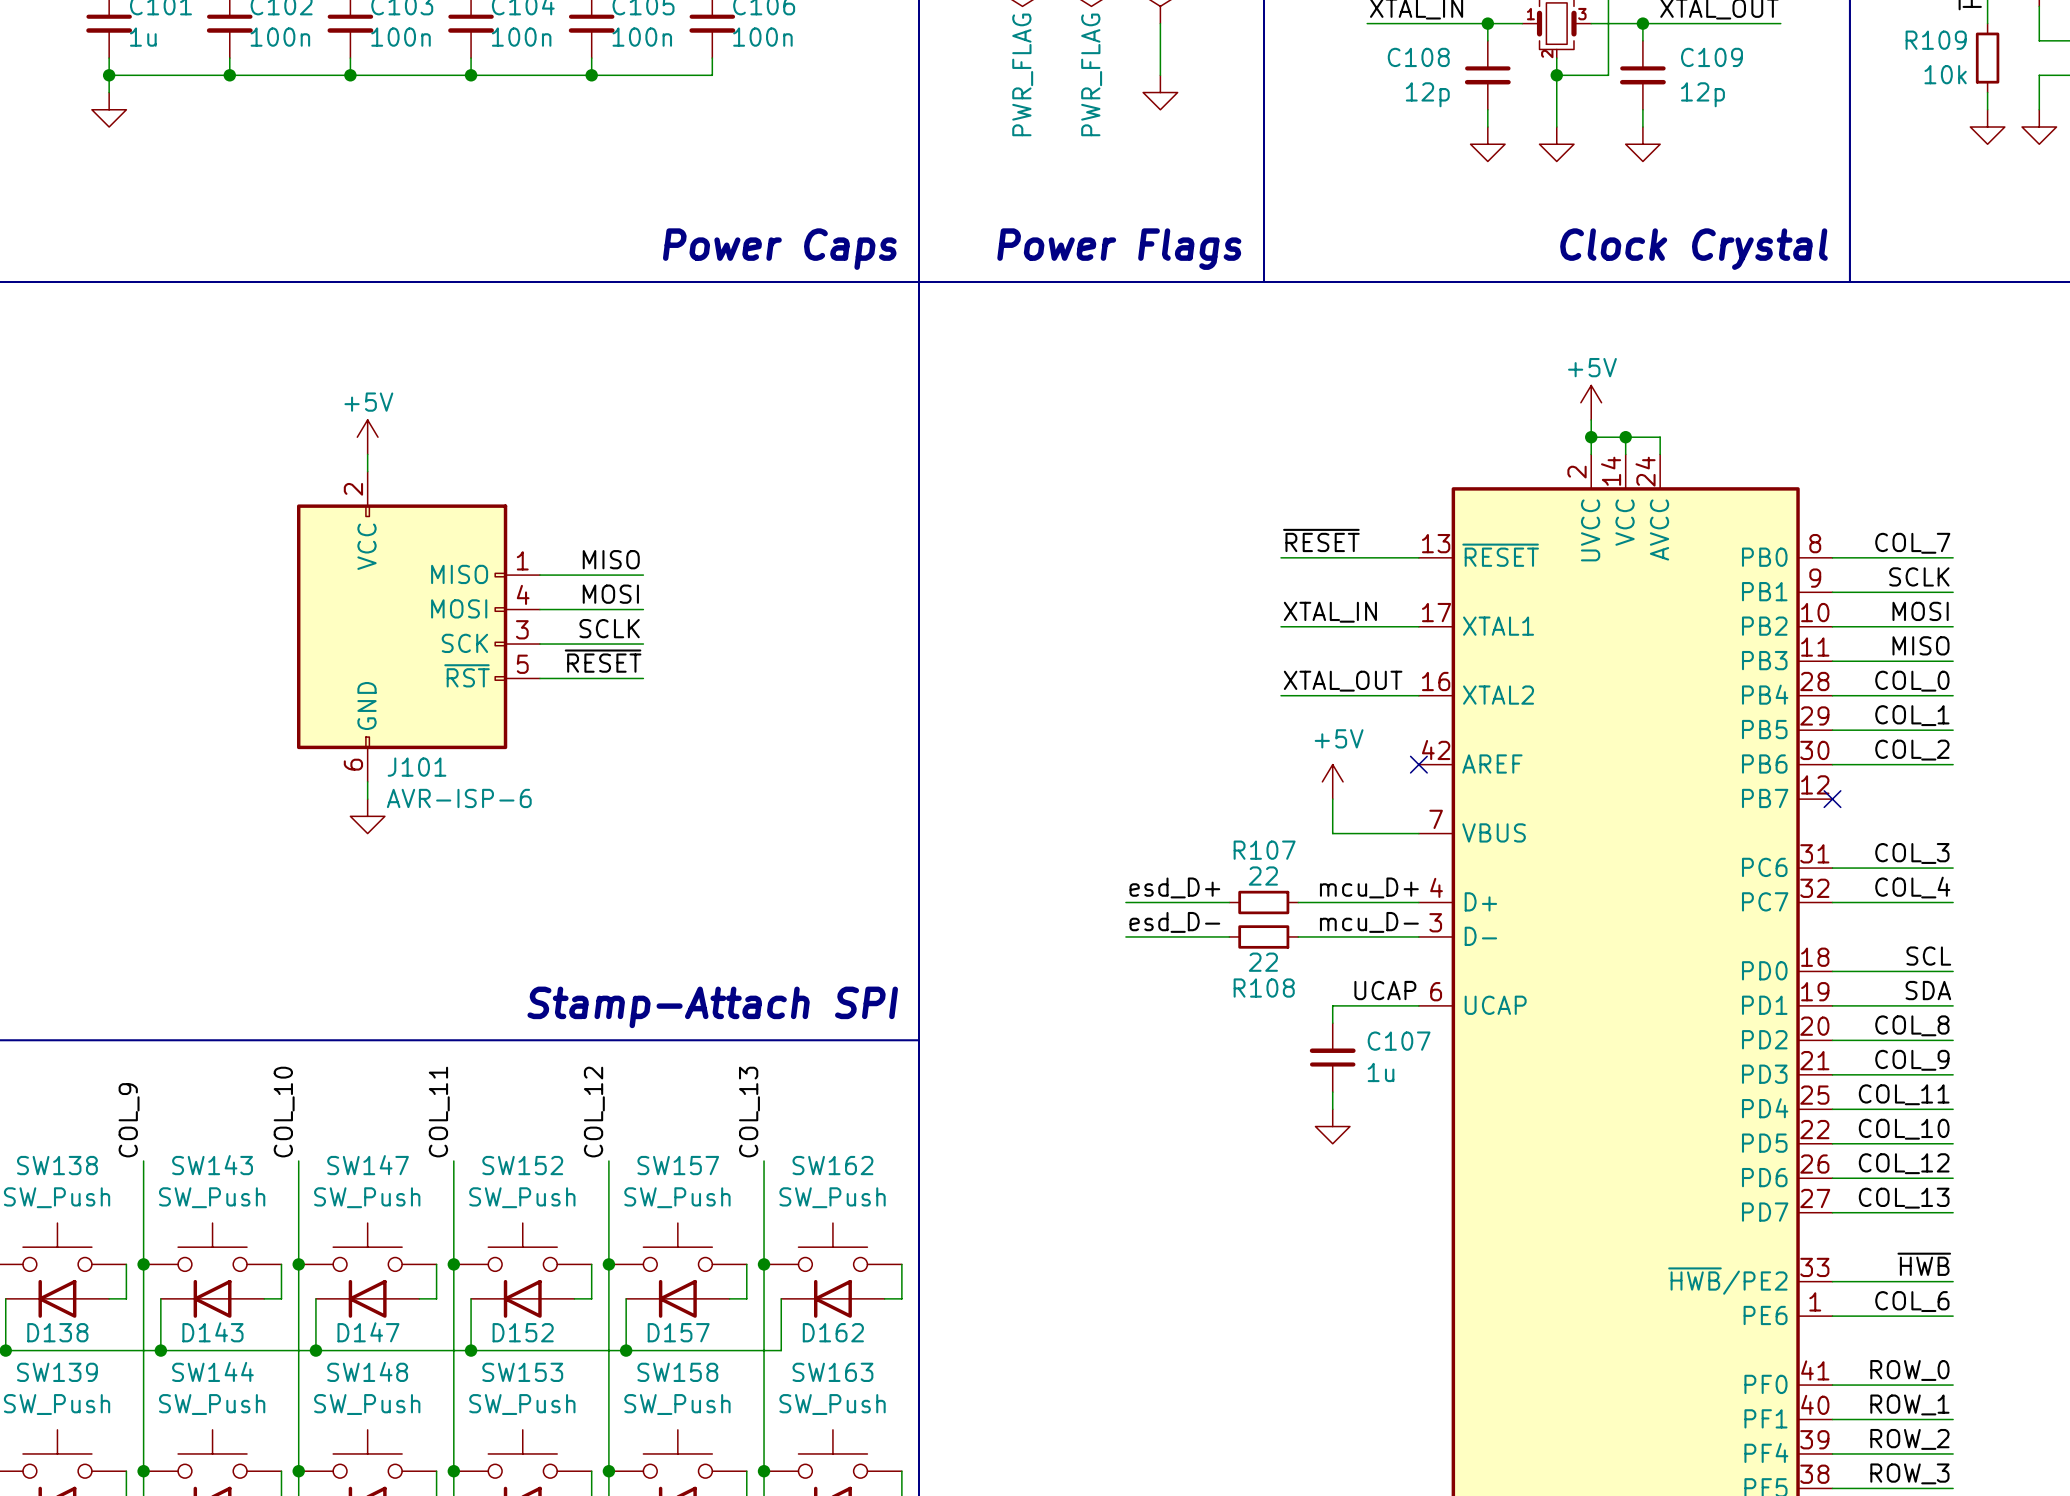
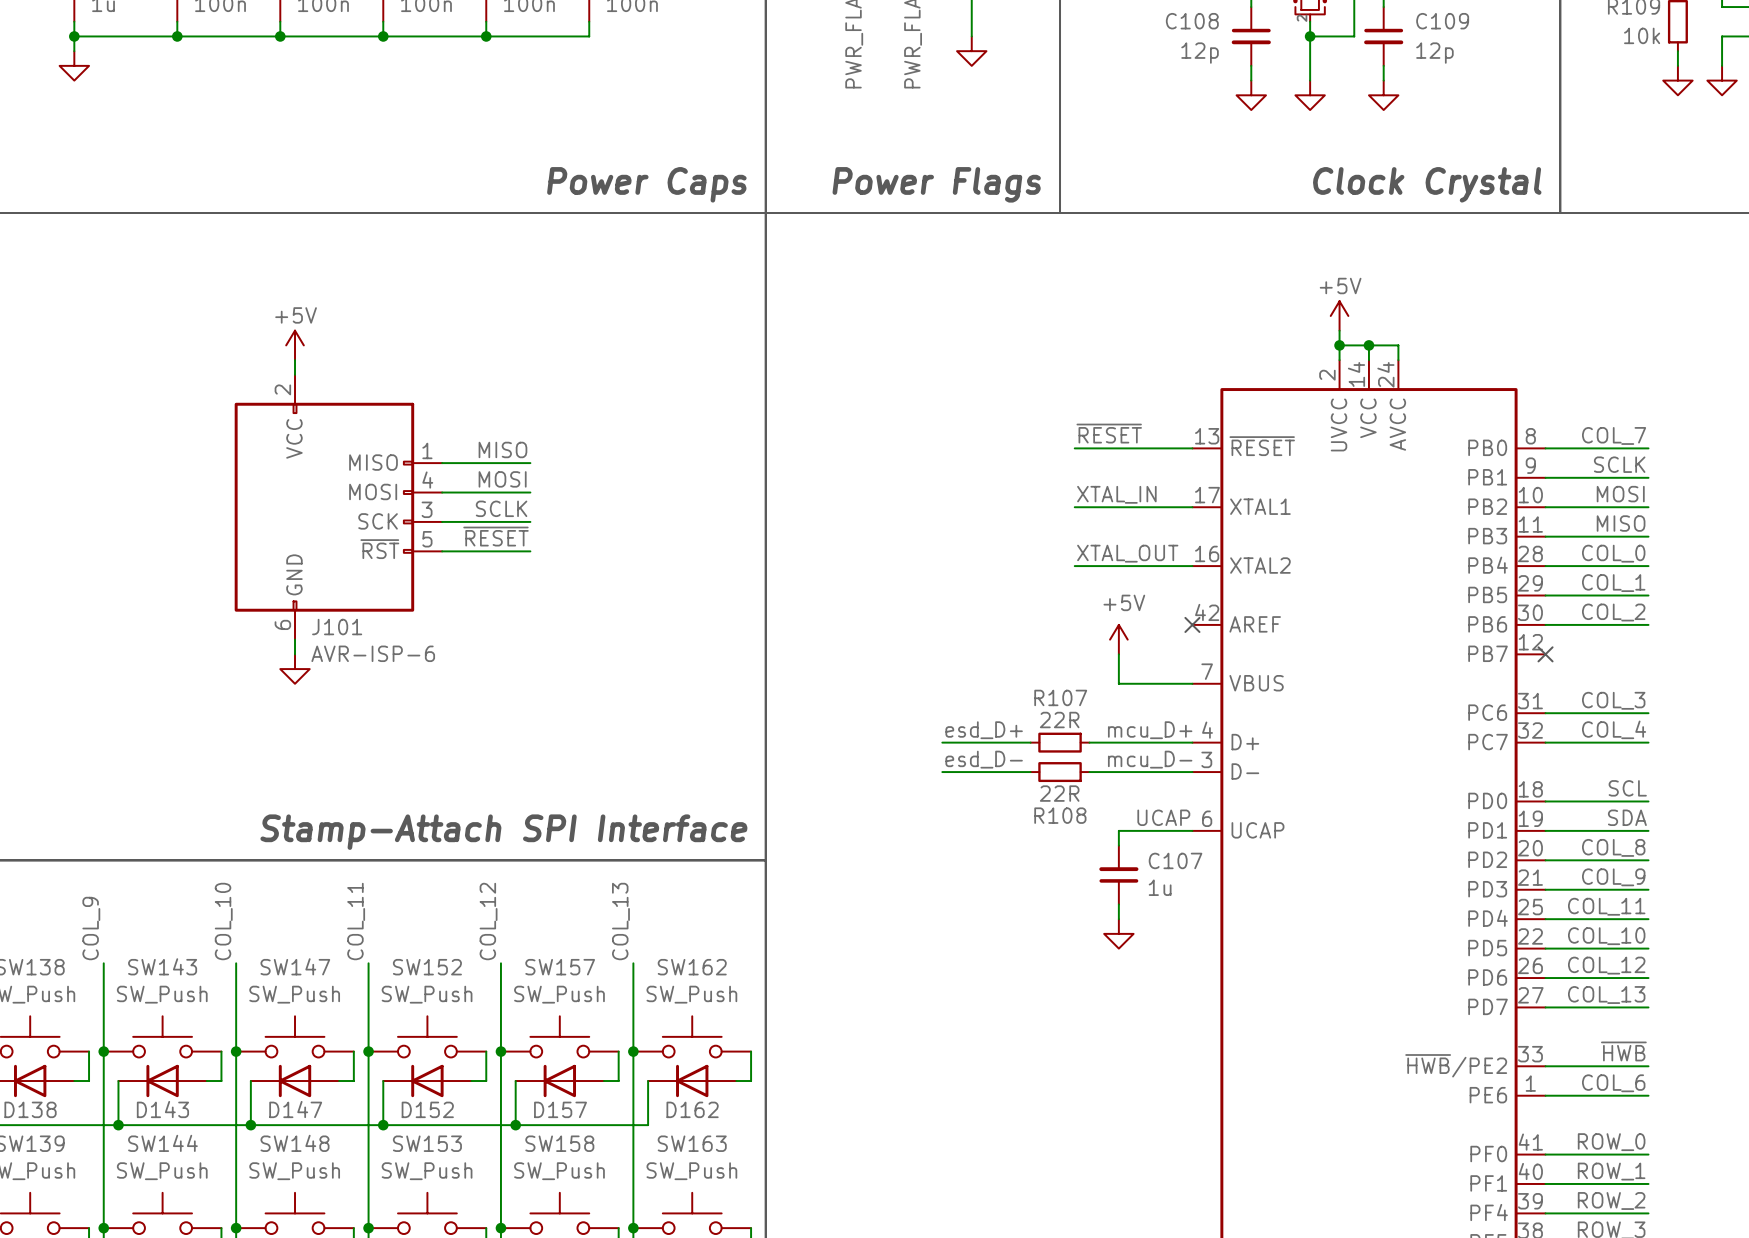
R107 value: 22 (1263, 876) -> 22R (1059, 720)
R108 value: 22 (1263, 962) -> 22R (1059, 793)
text: Stamp-Attach SPI (712, 1007) -> Stamp-Attach SPI Interface (503, 832)

